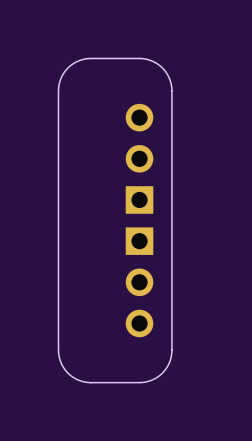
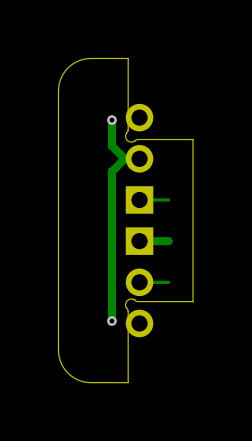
board edge: (128, 58) (146, 59) (159, 65) (168, 76) (171, 90) (171, 353) (166, 367) (156, 377) (146, 381) (128, 382) -> (128, 58) (126, 139) (131, 142) (137, 139) (193, 139) (193, 301) (137, 301) (131, 299) (126, 301) (128, 382)
track: none -> (111, 120) (111, 146) (124, 158) (111, 171) (111, 321)
via: none -> (111, 120)
track: none -> (168, 199) (144, 199)
track: none -> (168, 241) (144, 241)
track: none -> (168, 282) (144, 282)
via: none -> (111, 321)

